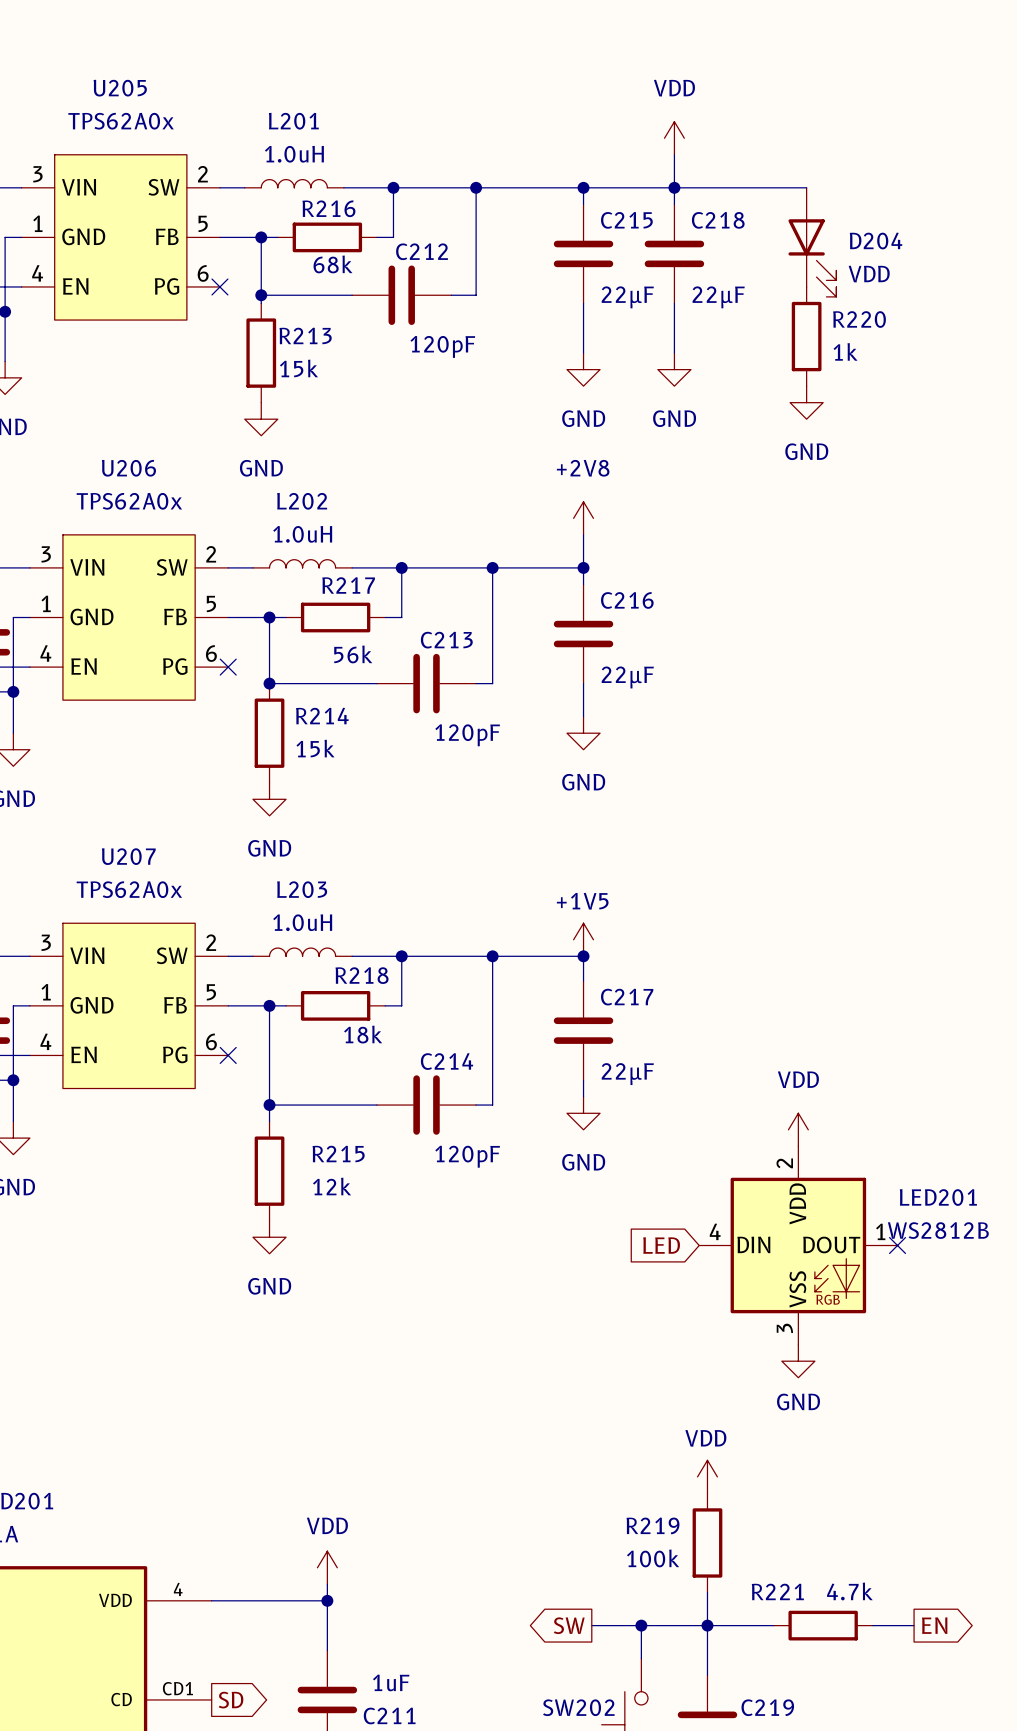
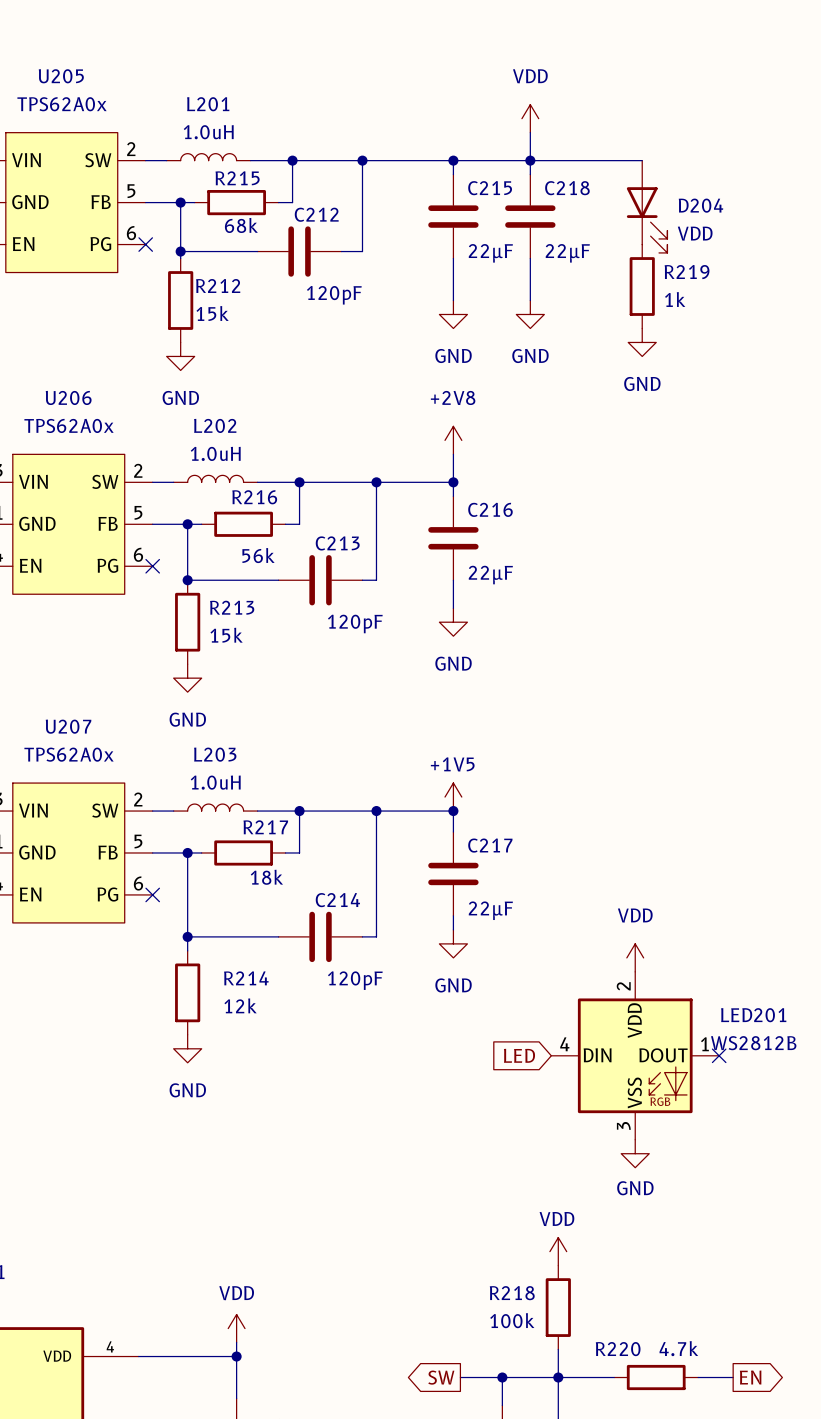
R216 name: R216 (328, 208) -> R215 (237, 178)
R220 name: R220 (859, 319) -> R219 (687, 272)
R213 name: R213 (305, 335) -> R212 (218, 285)
R217 name: R217 (348, 585) -> R216 (254, 497)
R214 name: R214 (322, 716) -> R213 (232, 607)
R218 name: R218 (362, 975) -> R217 (265, 827)
R215 name: R215 (338, 1153) -> R214 (246, 978)
R219 name: R219 (652, 1525) -> R218 (512, 1293)
R221 name: R221 (777, 1591) -> R220 (618, 1349)

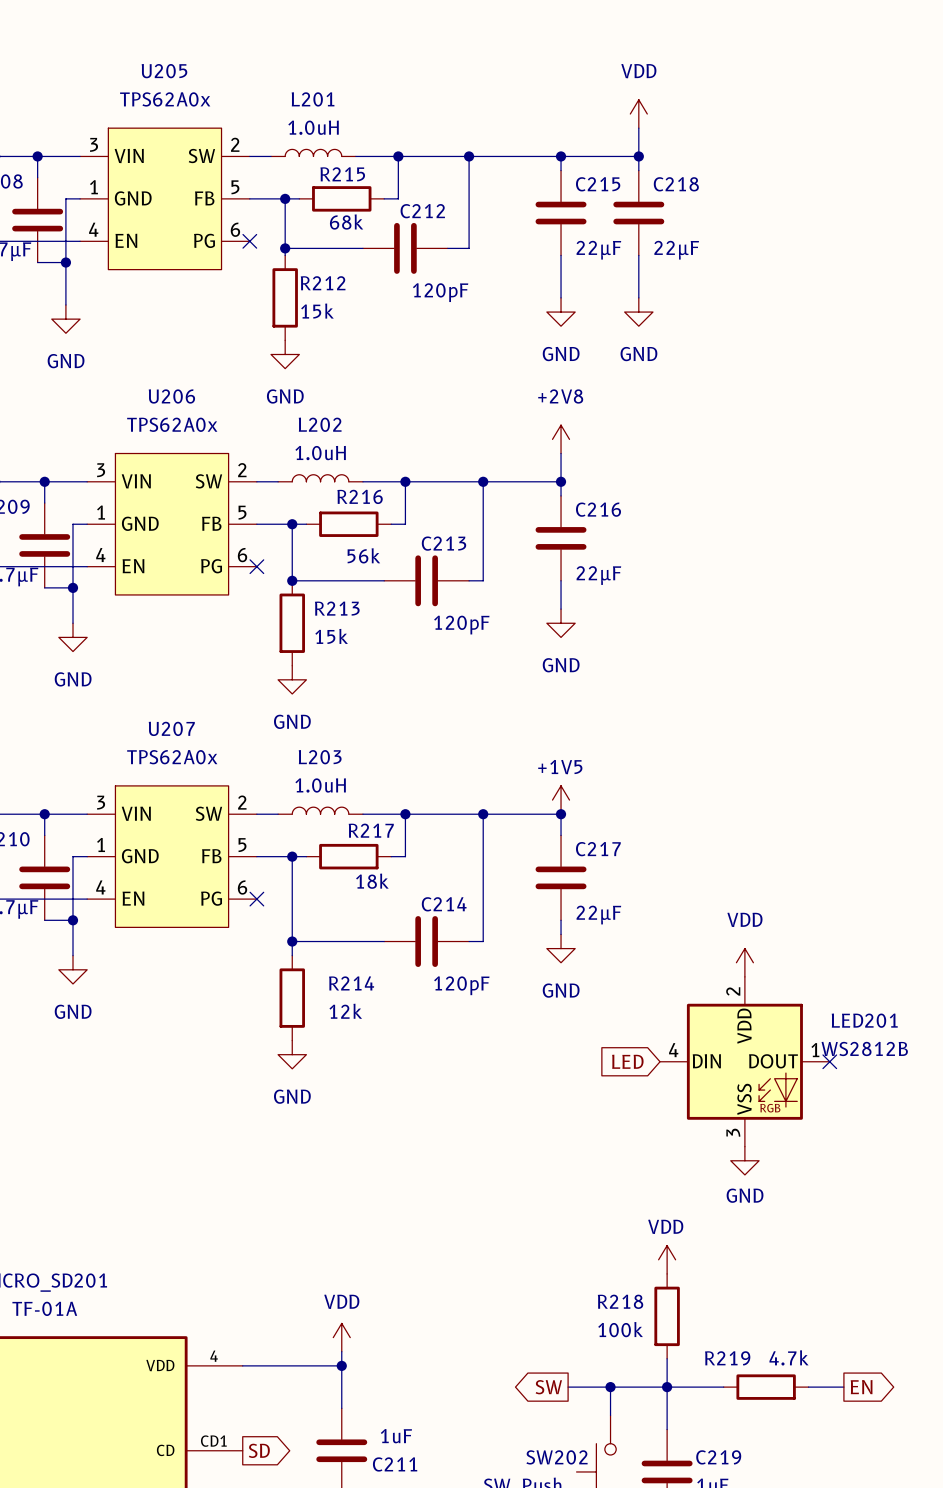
wire: (530, 160) (642, 160) -> none
D204: VDD (647, 206) -> none
R219: 1k (642, 286) -> none
power symbol: GND (642, 342) -> none
R220 name: R220 (618, 1349) -> R219 (727, 1358)

